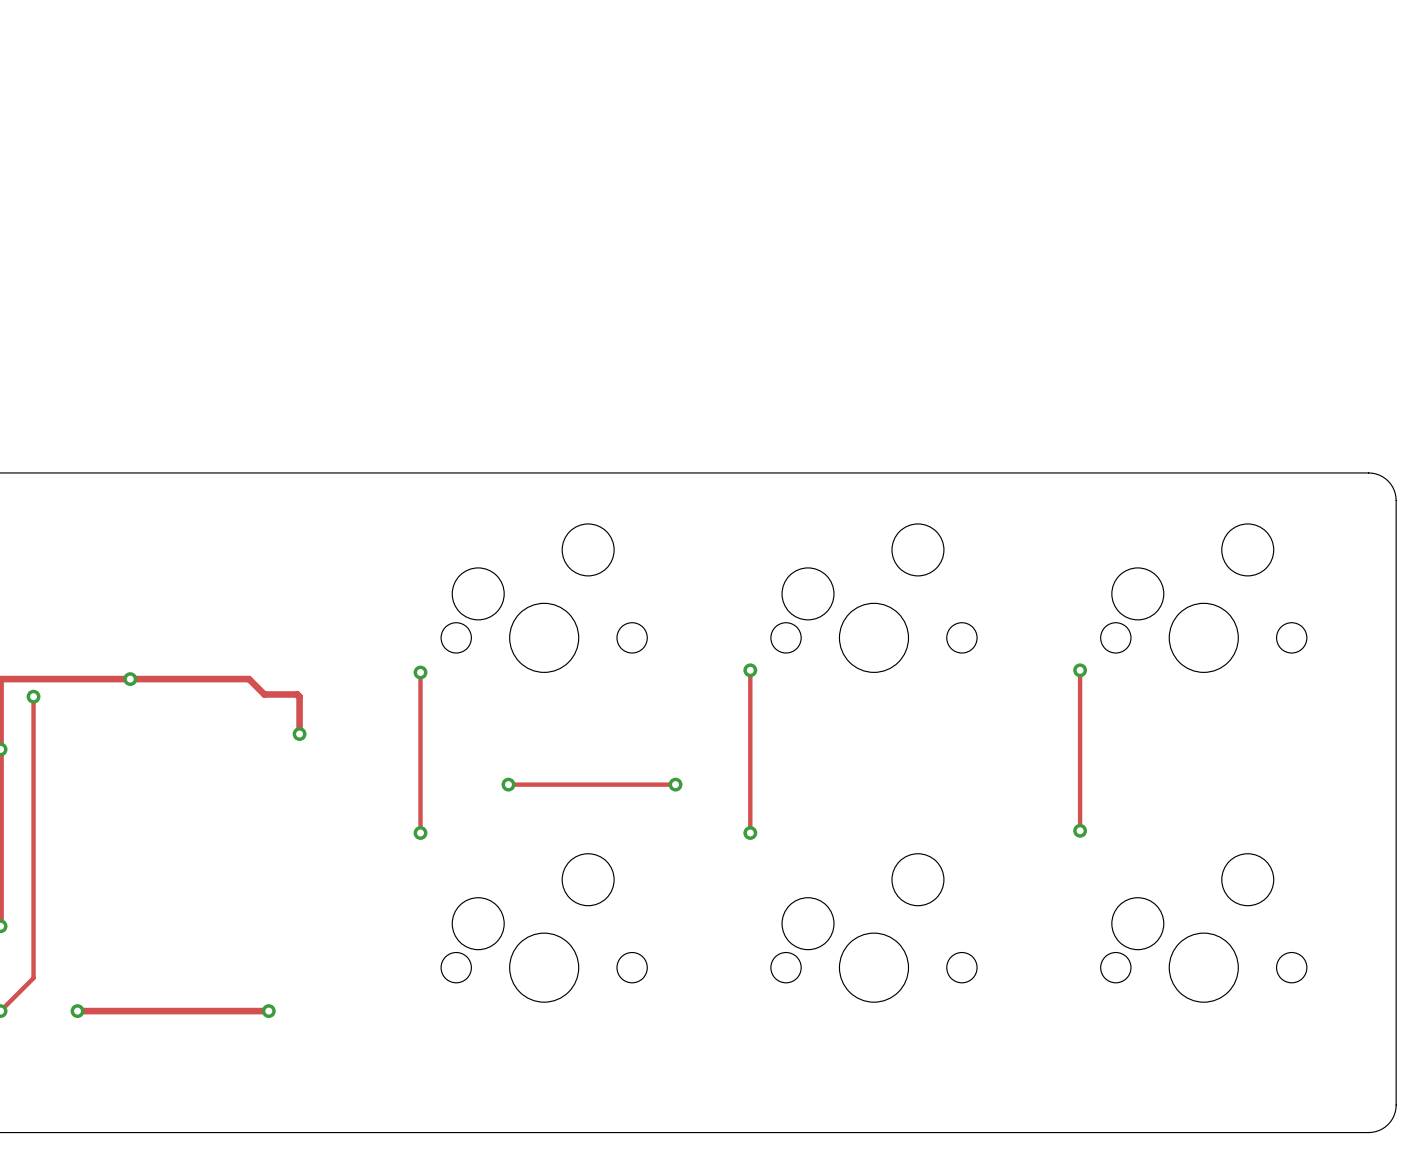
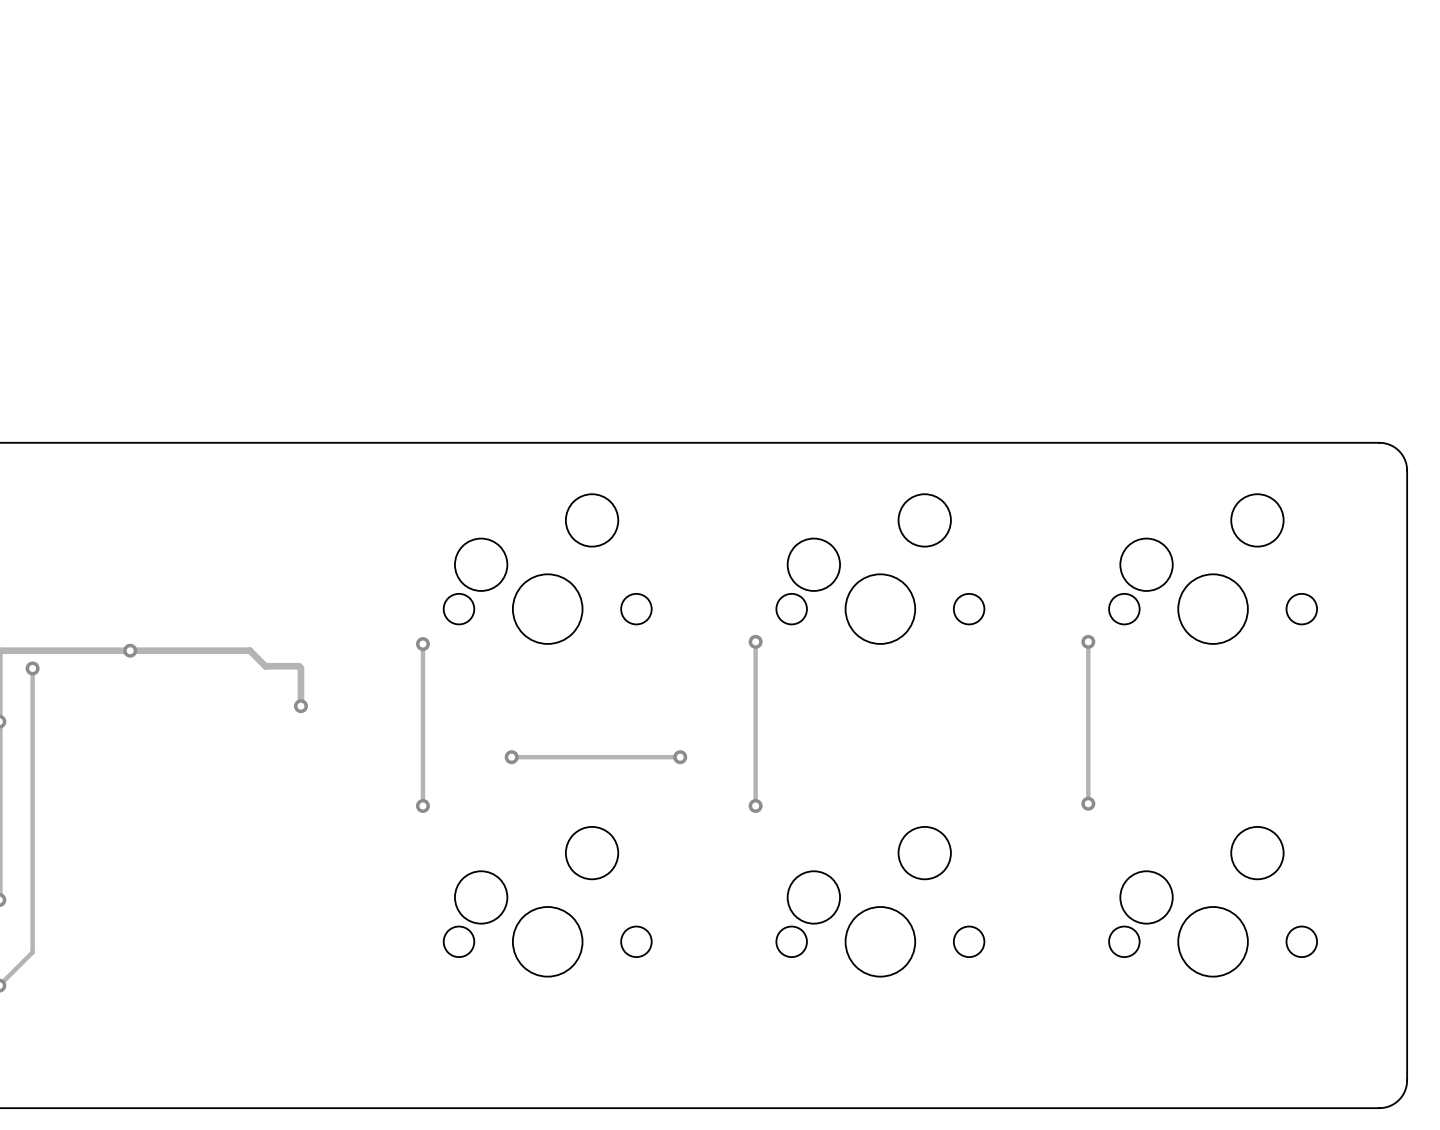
track: (77, 1011) (268, 1011) -> none
via: (77, 1011) -> none
via: (268, 1011) -> none

